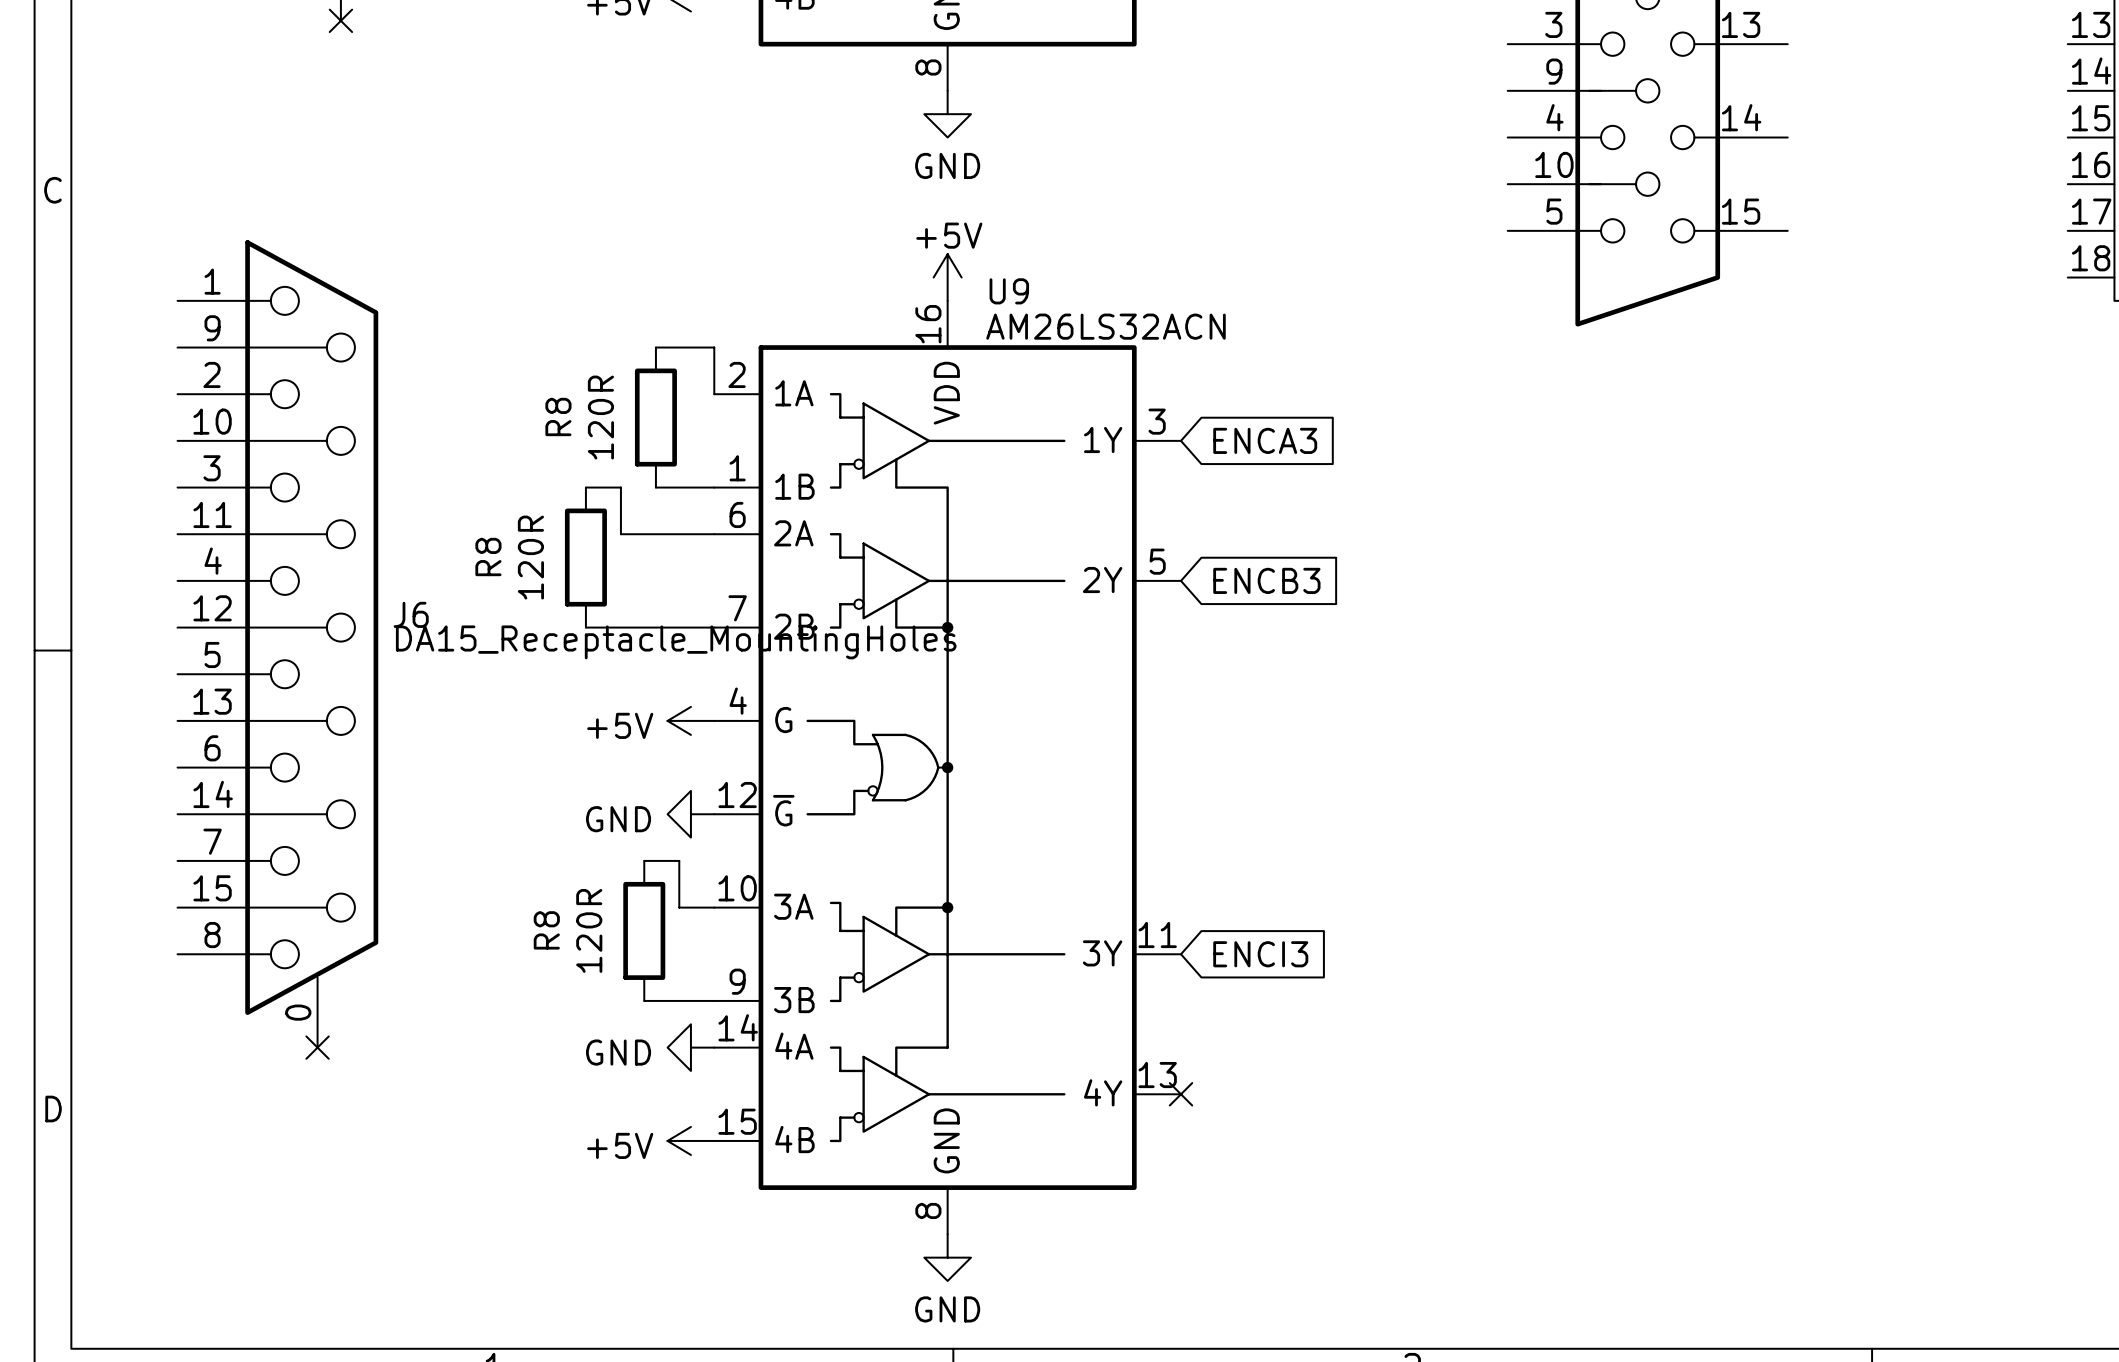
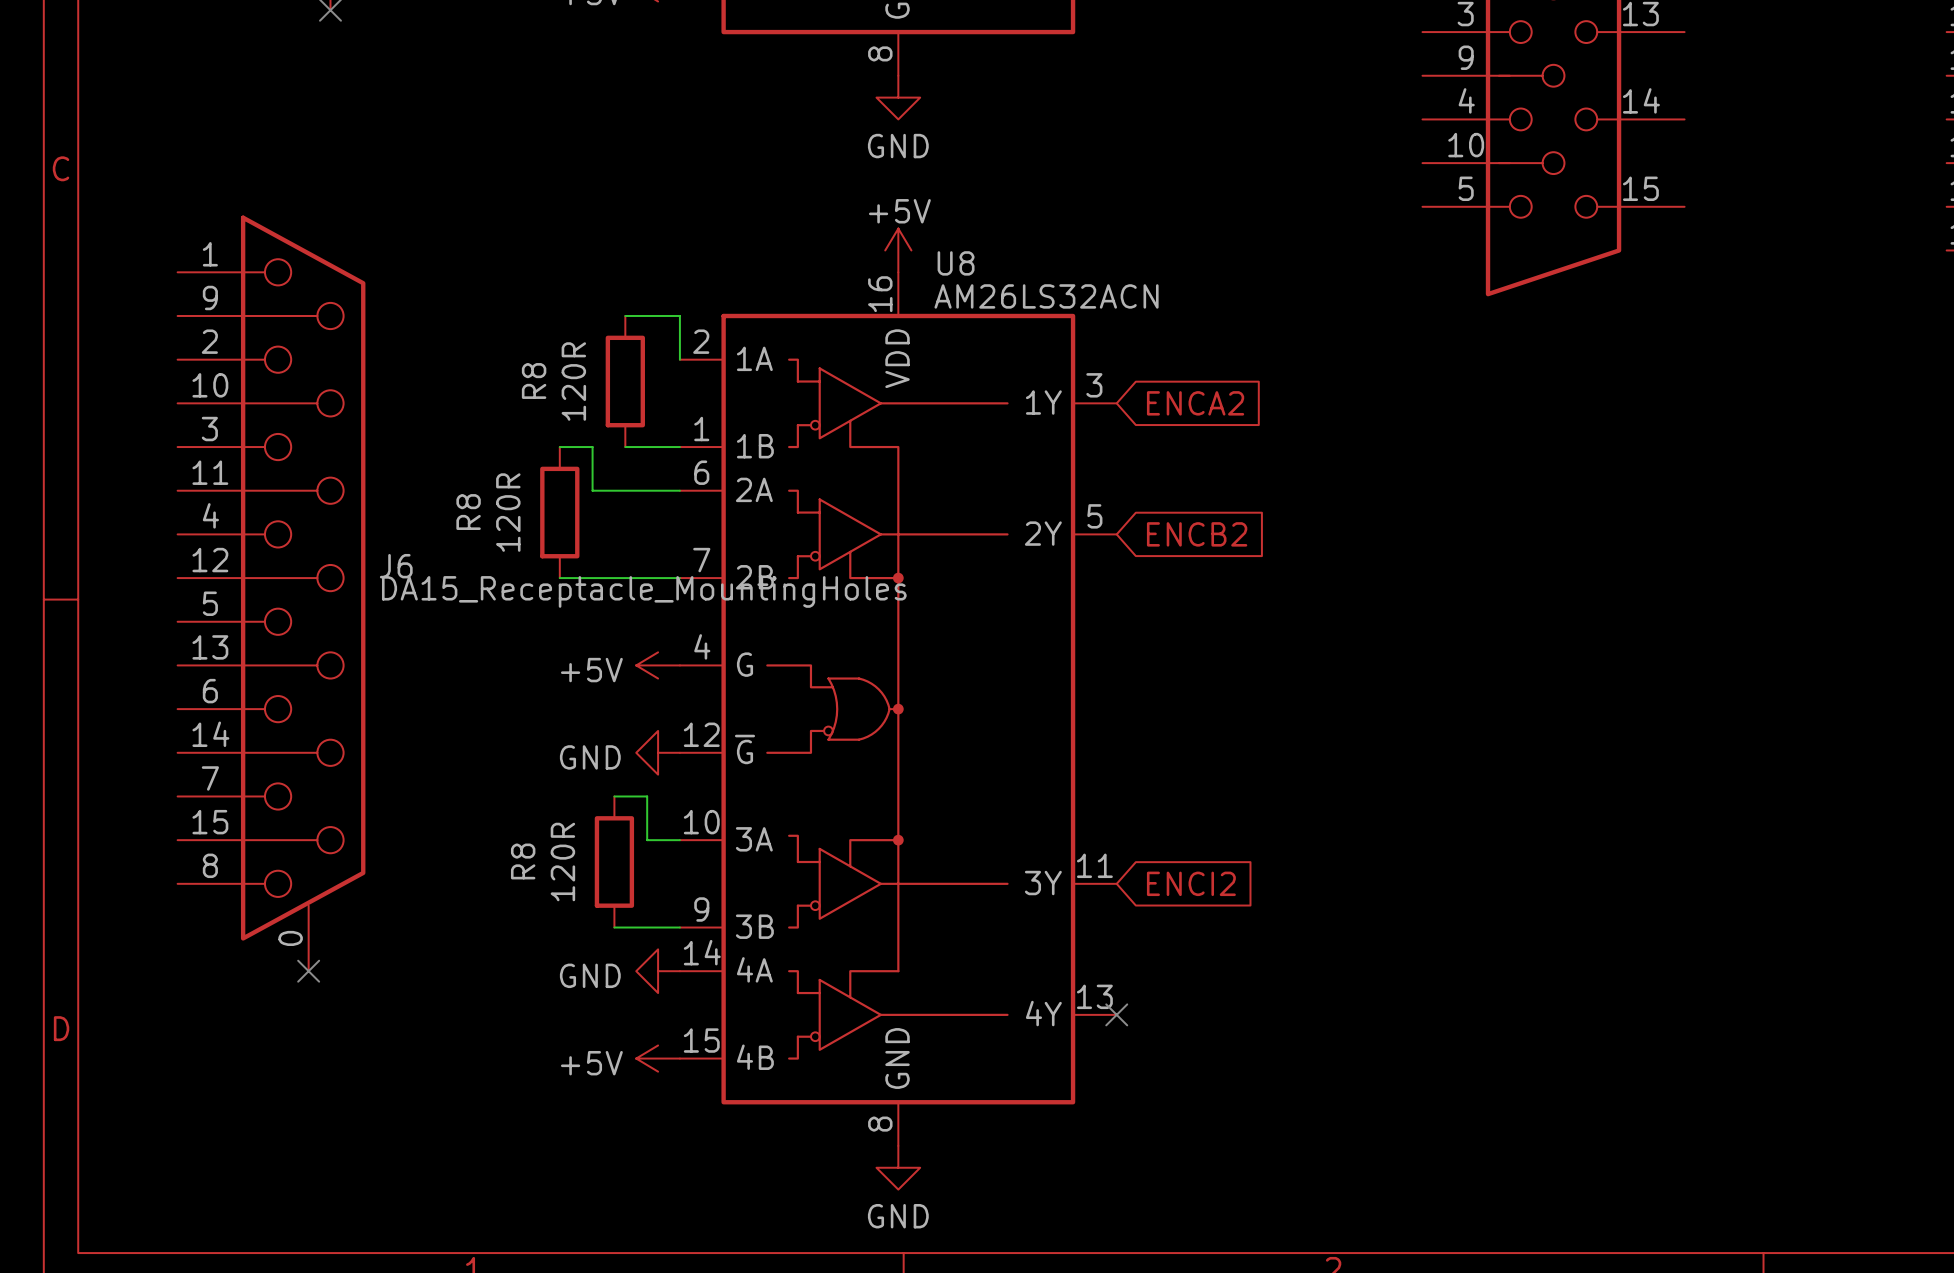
U9 name: U9 (1009, 291) -> U8 (956, 263)
global label: ENCA3 (1265, 440) -> ENCA2 (1195, 403)
global label: ENCB3 (1266, 580) -> ENCB2 (1197, 534)
global label: ENCI3 (1260, 954) -> ENCI2 (1191, 883)

